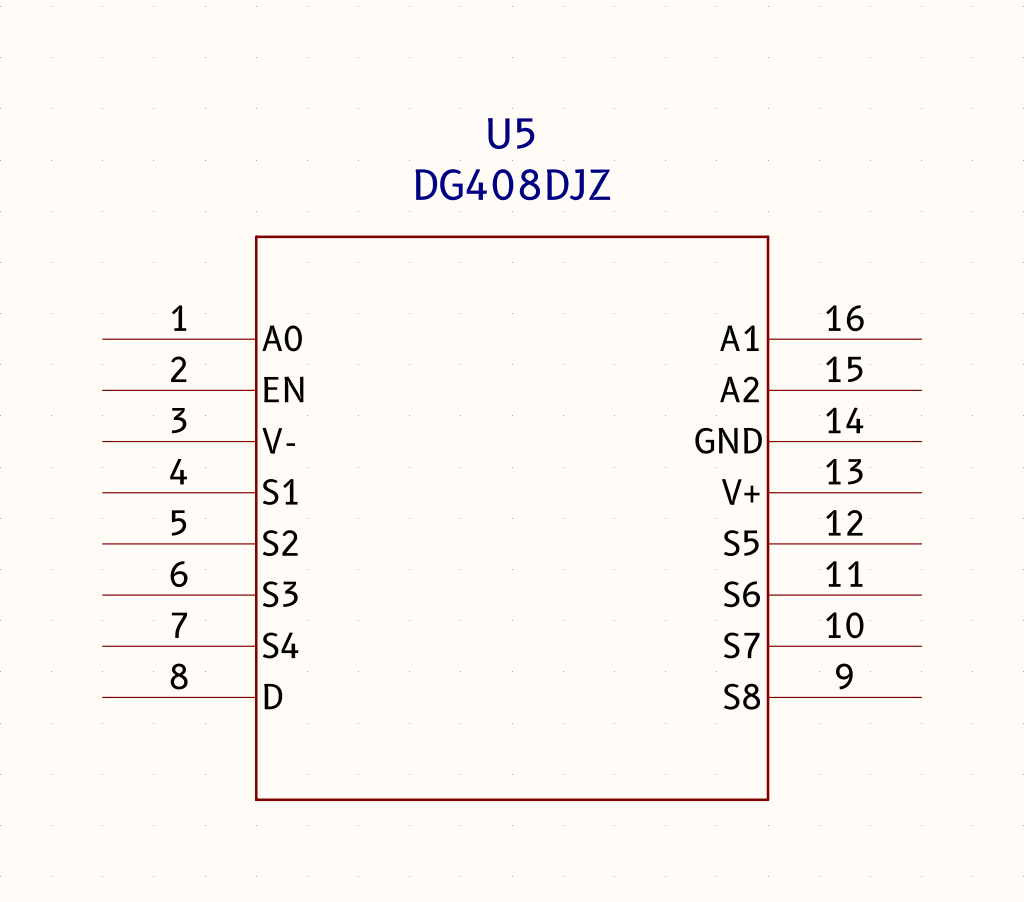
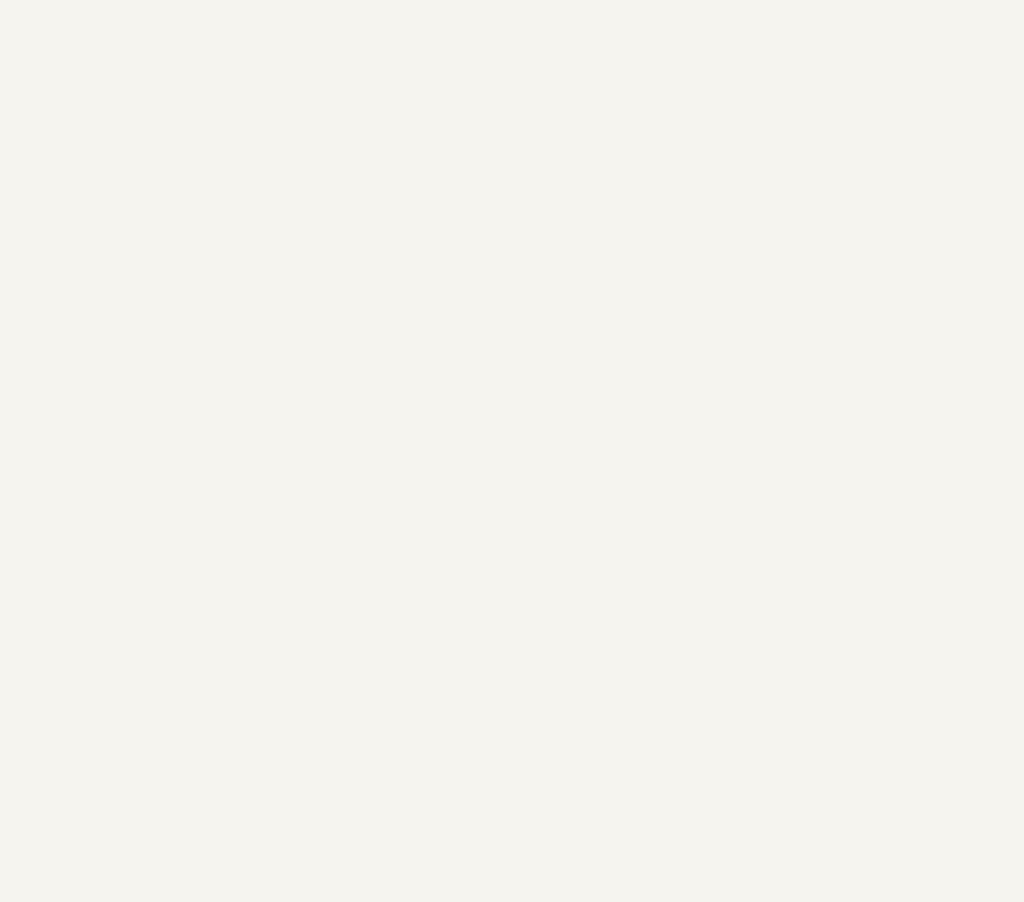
U5: DG408DJZ (512, 518) -> none

